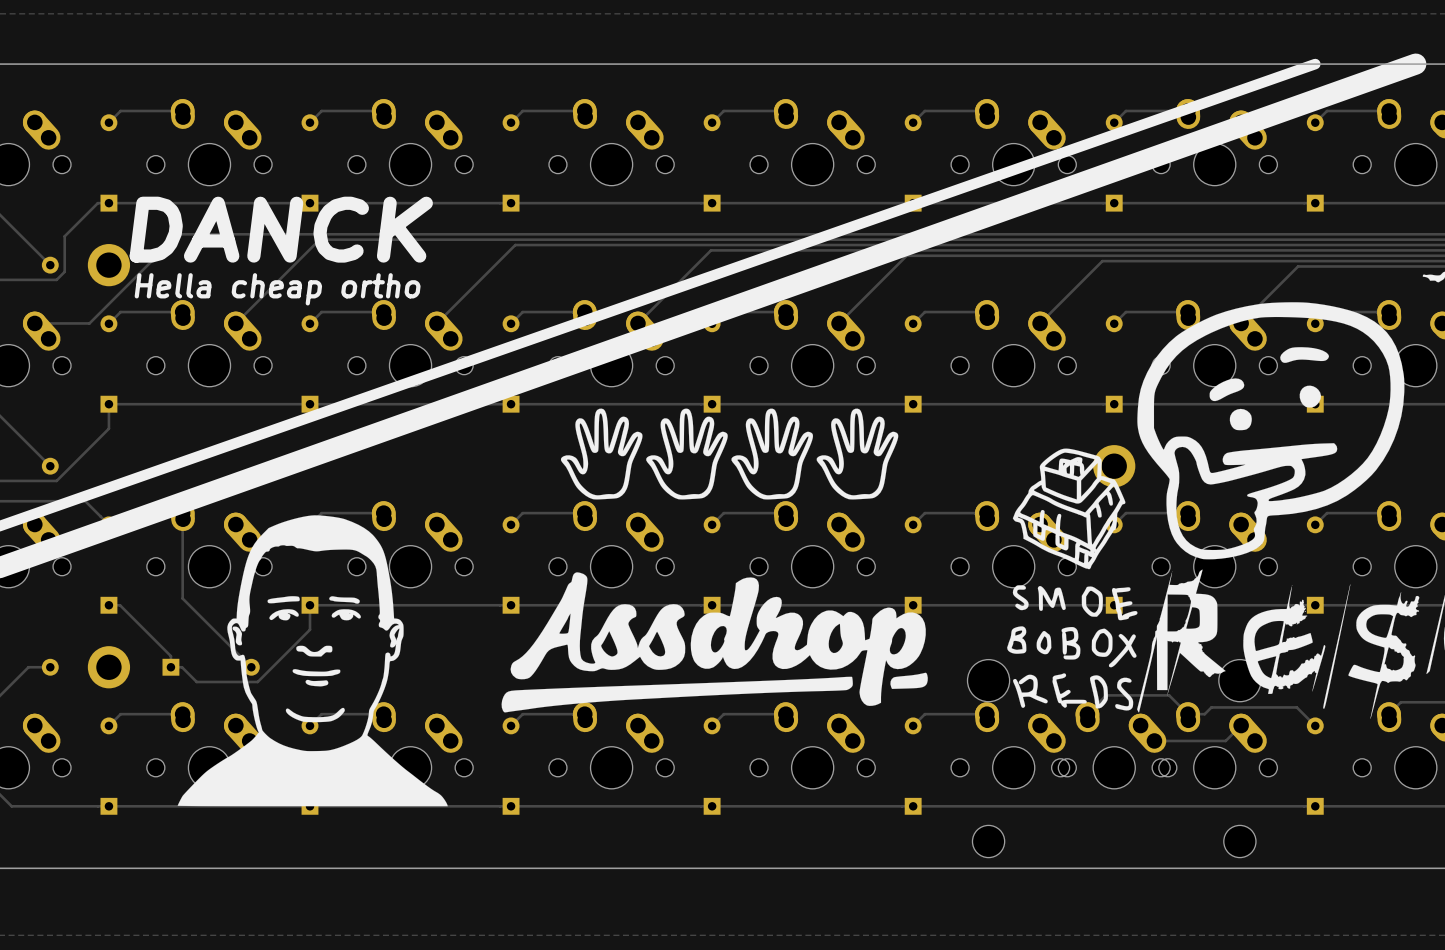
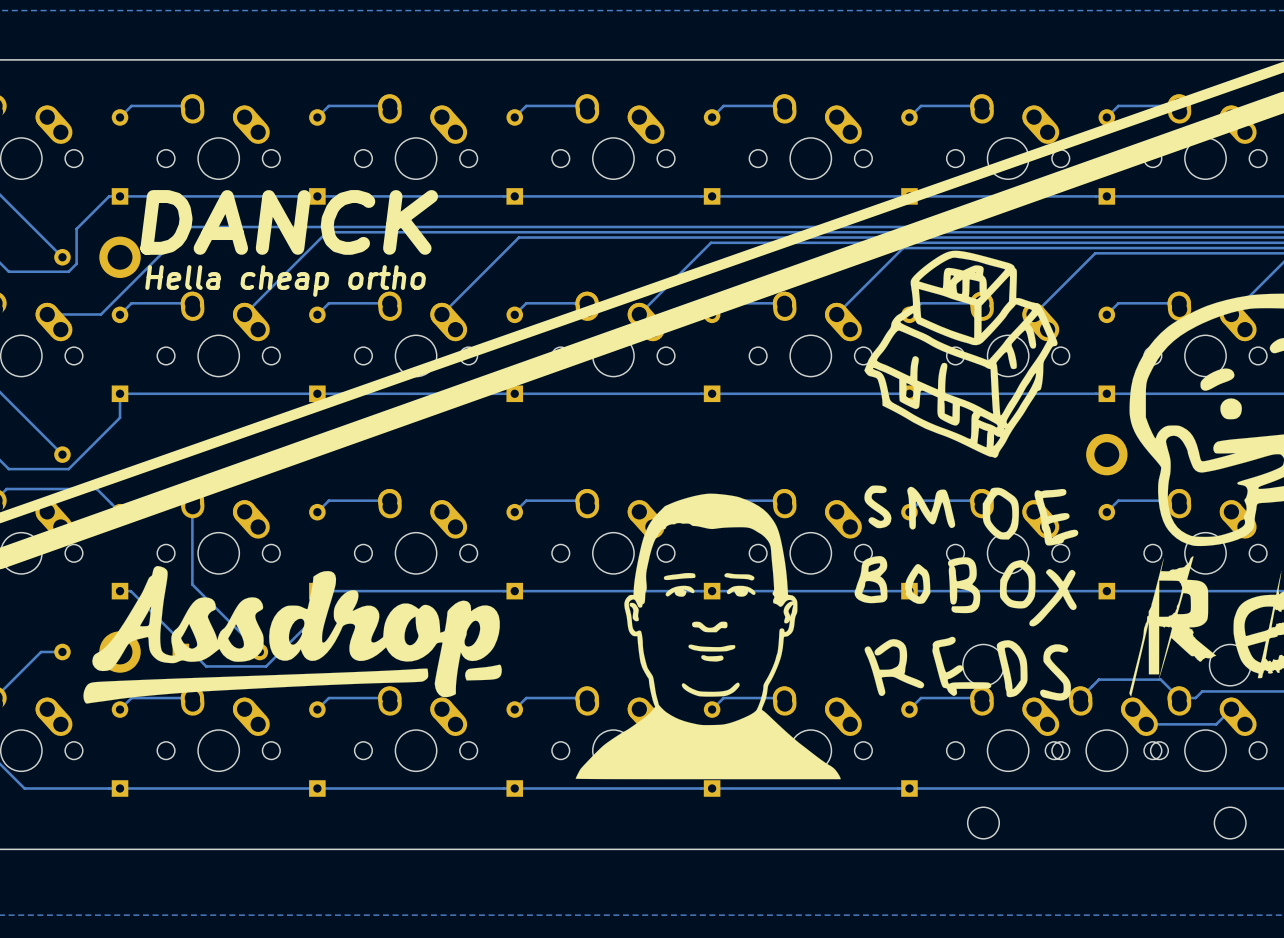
drawing: none -> [854, 250, 1079, 701]
drawing: [560, 408, 899, 500] -> none
drawing: [1007, 448, 1138, 711] -> none
drawing: none -> [575, 493, 841, 780]
drawing: [177, 515, 448, 807] -> none
drawing: [501, 572, 928, 713] -> none
drawing: none -> [83, 566, 502, 704]

